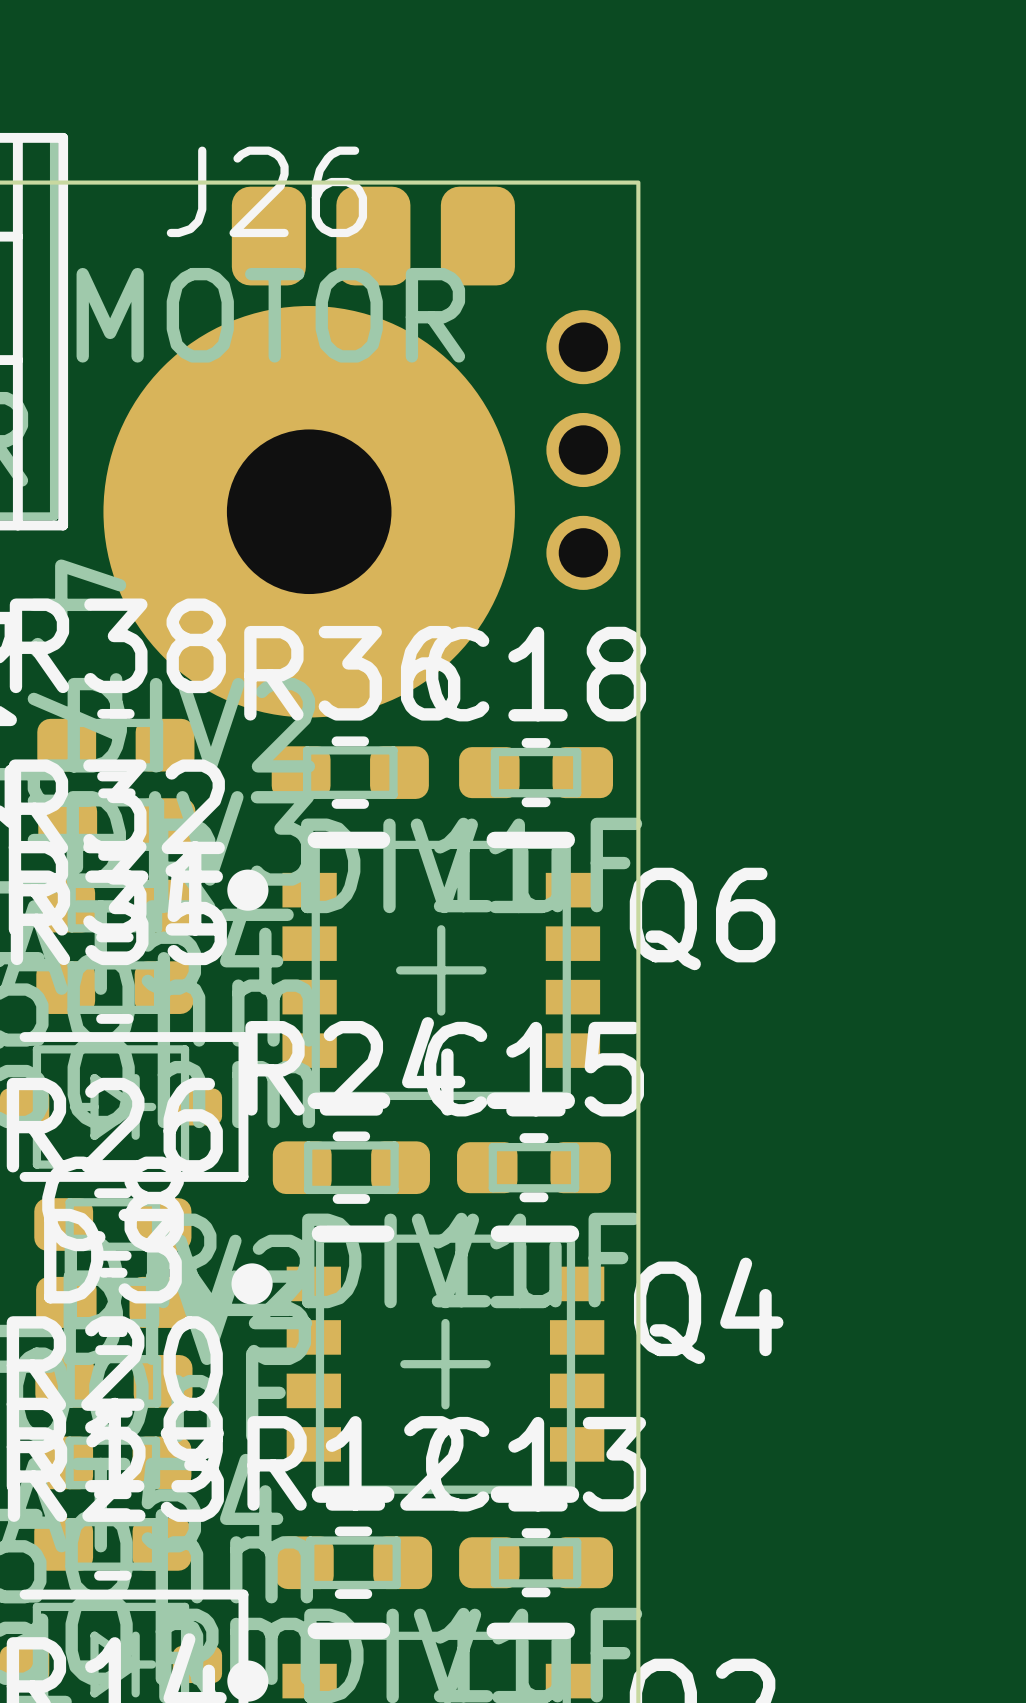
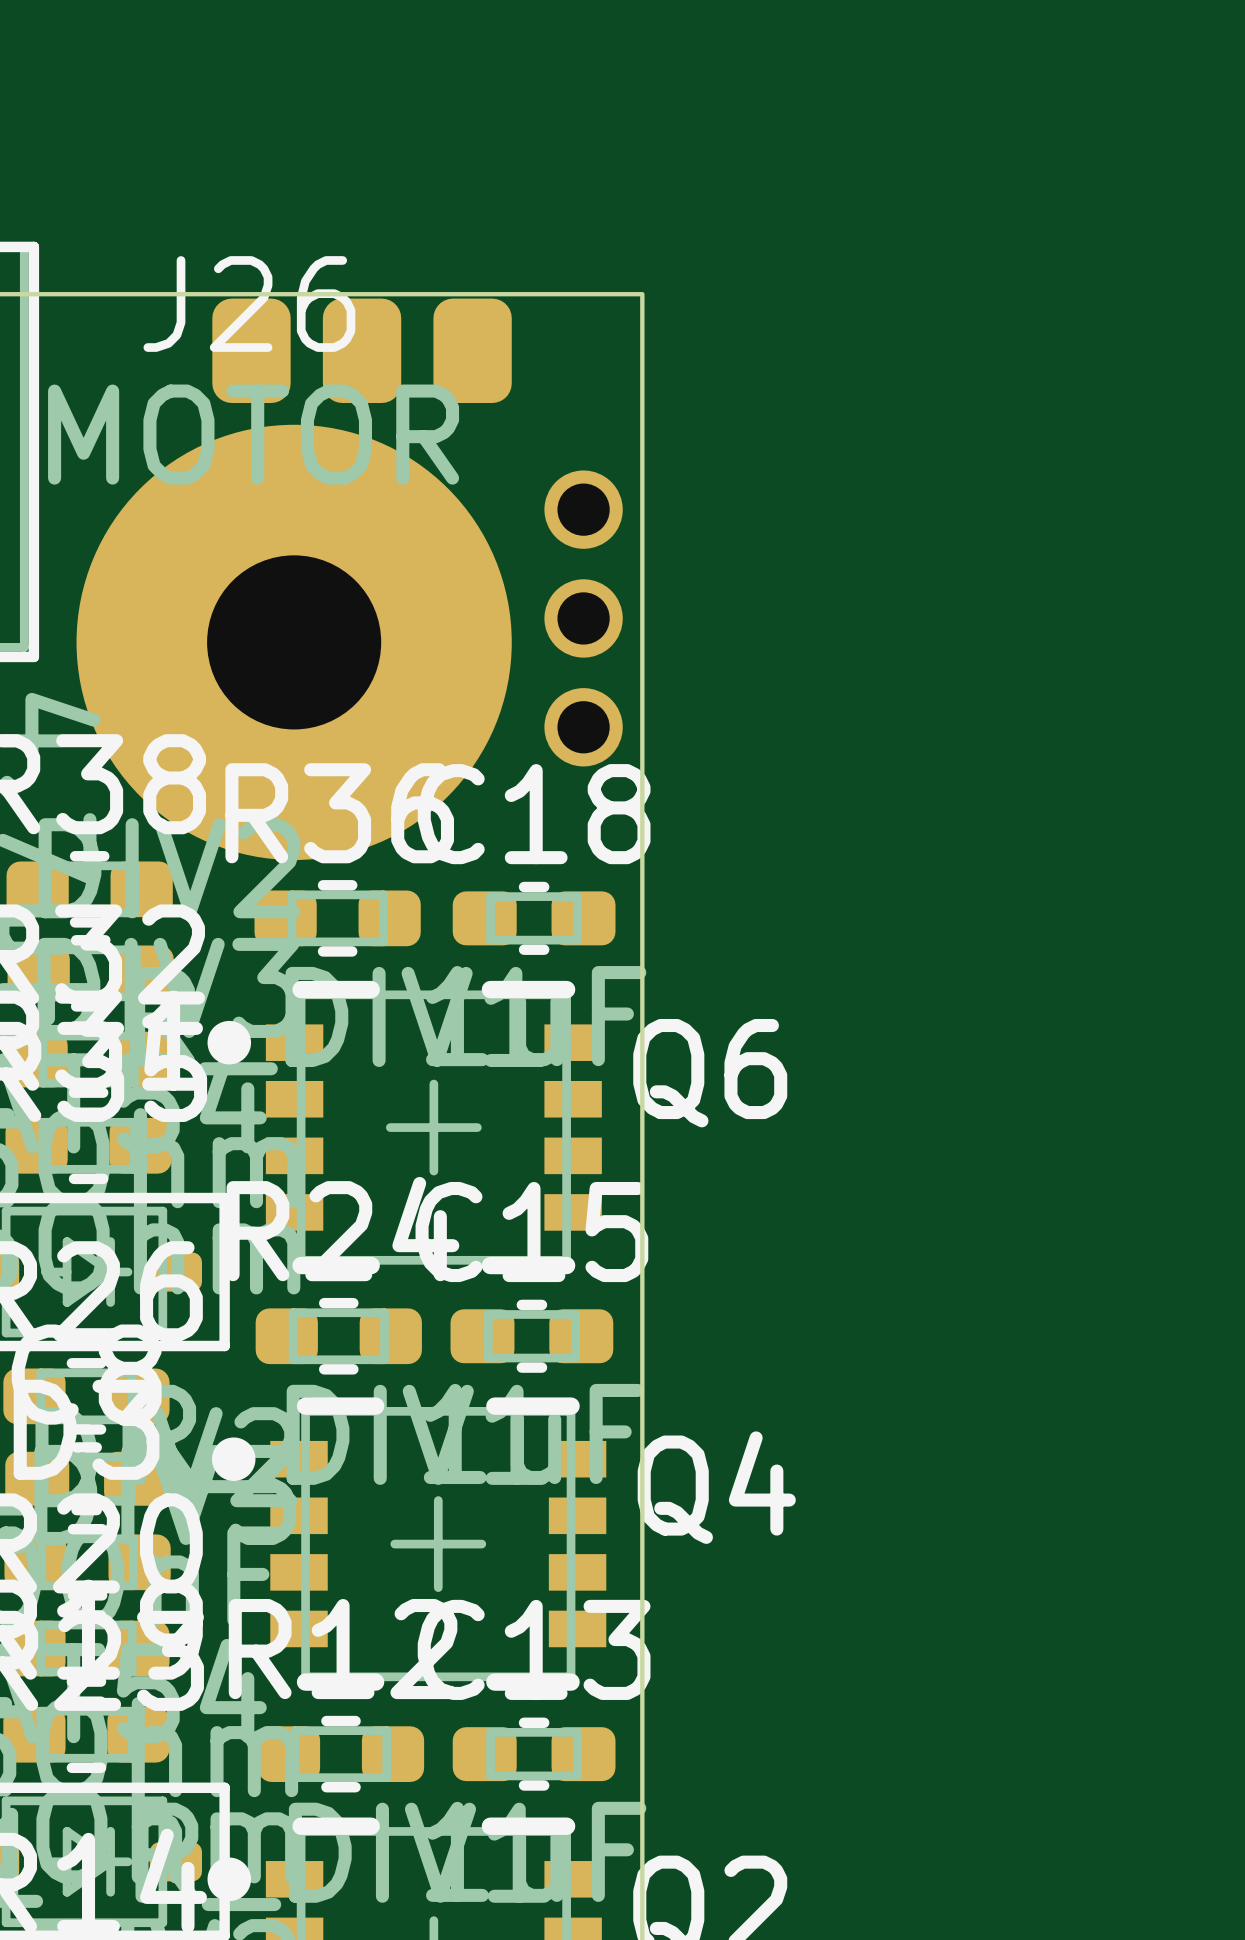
part position: (583, 450) -> (583, 618)

